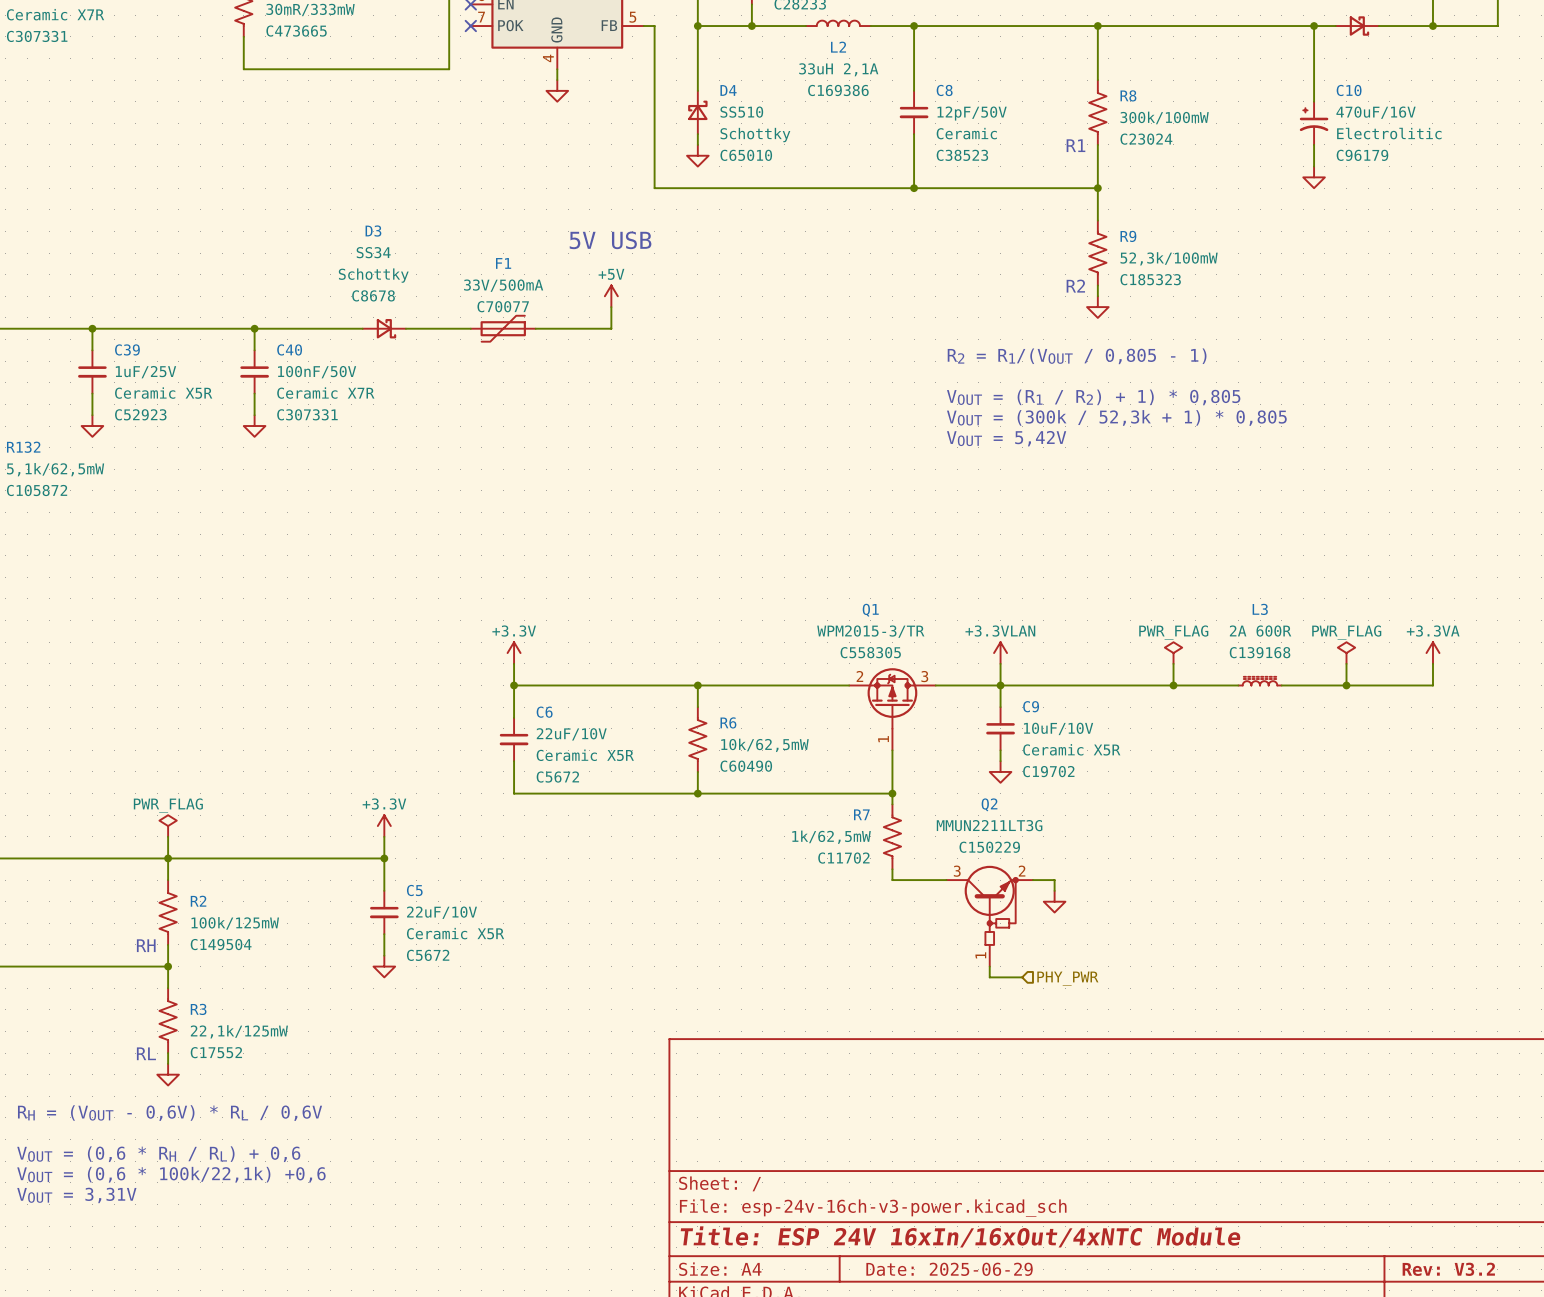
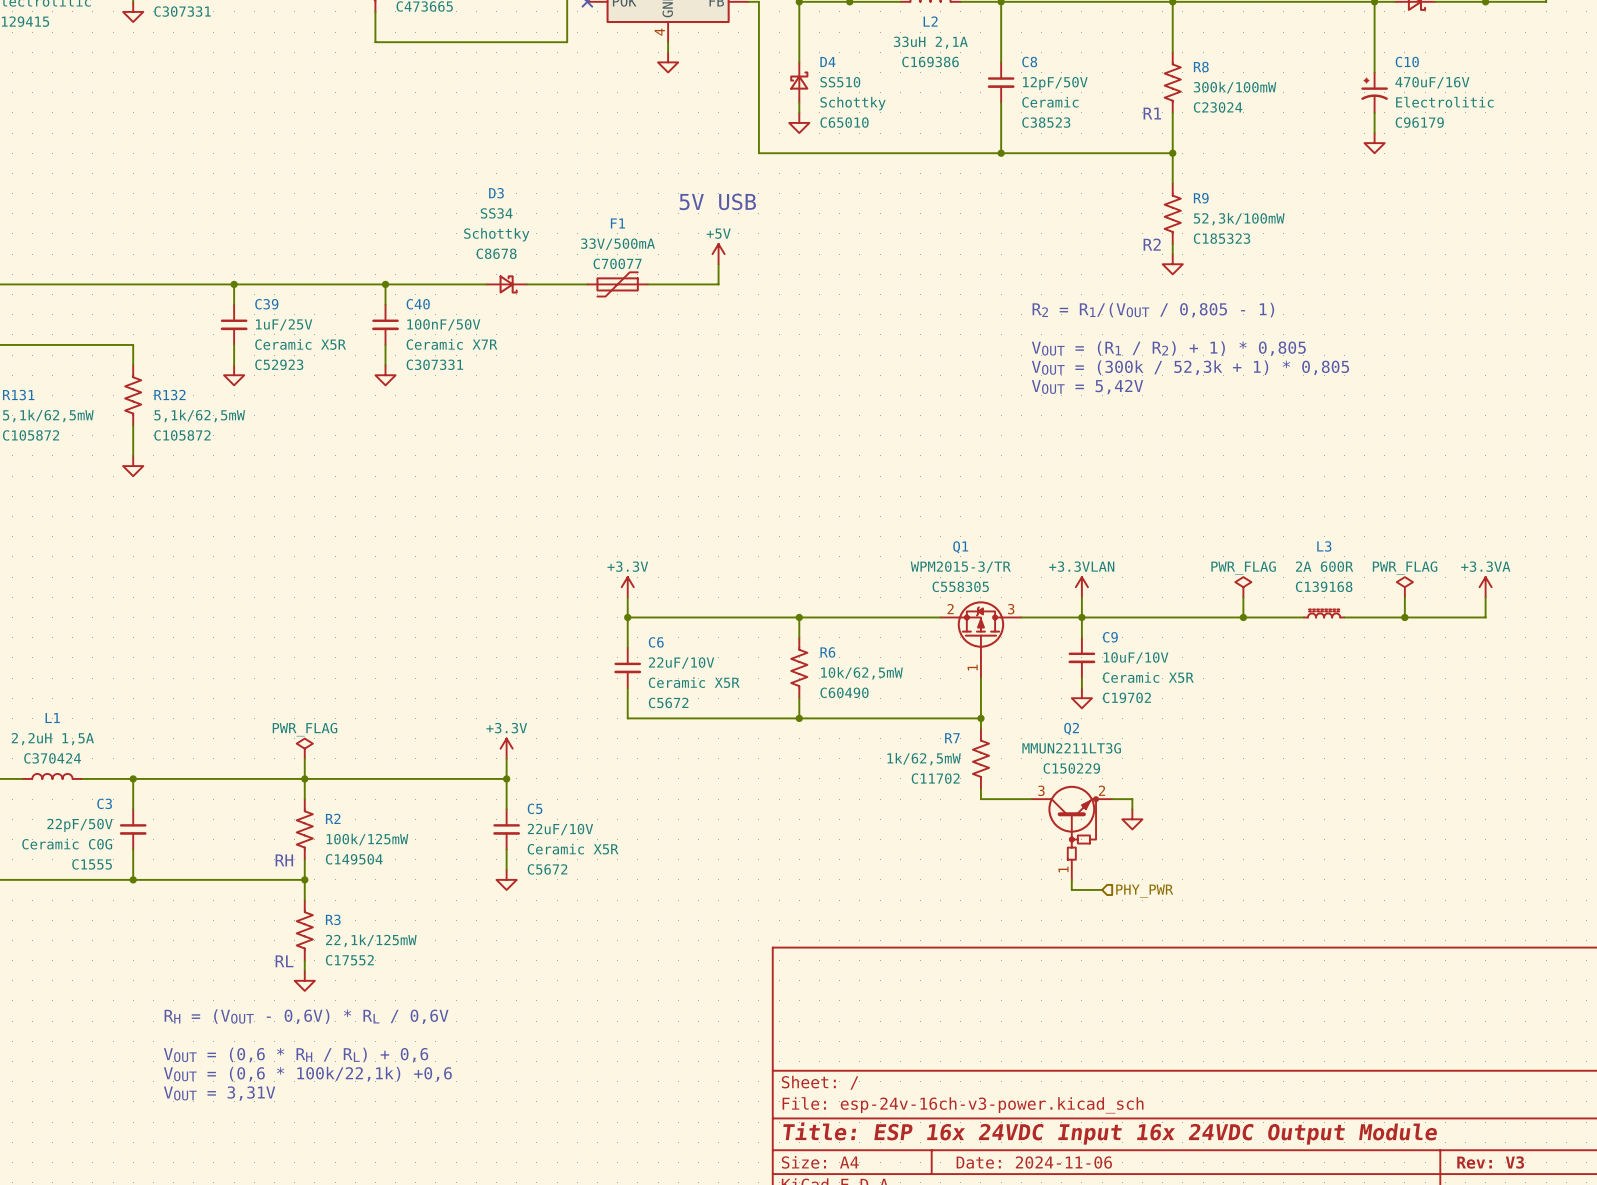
title block: Title: ESP 24V 16xIn/16xOut/4xNTC Module (960, 1236) -> Title: ESP 16x 24VDC Input 16x 24VDC Output Module (1110, 1133)
title block: Date: 2025-06-29 (949, 1269) -> Date: 2024-11-06 (1034, 1162)
title block: Rev: V3.2 (1448, 1269) -> Rev: V3 (1490, 1162)

